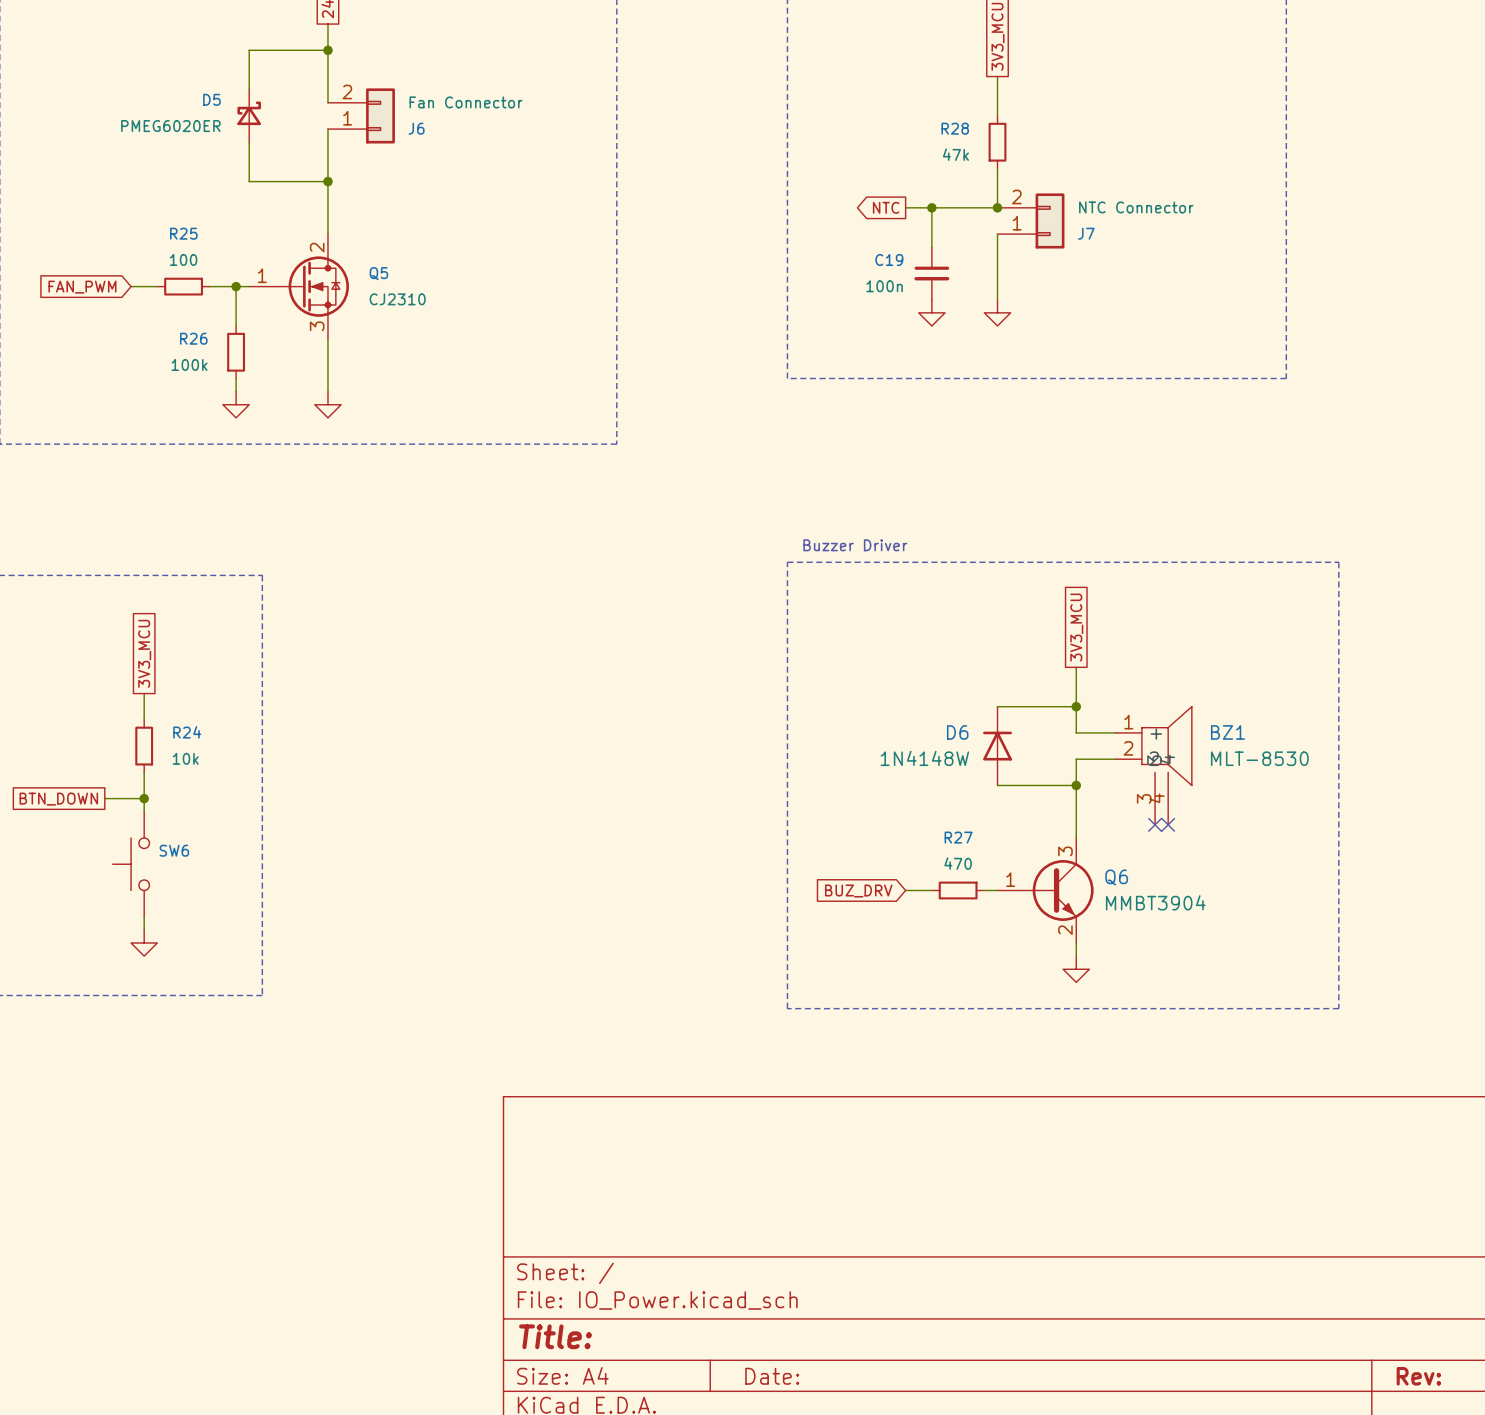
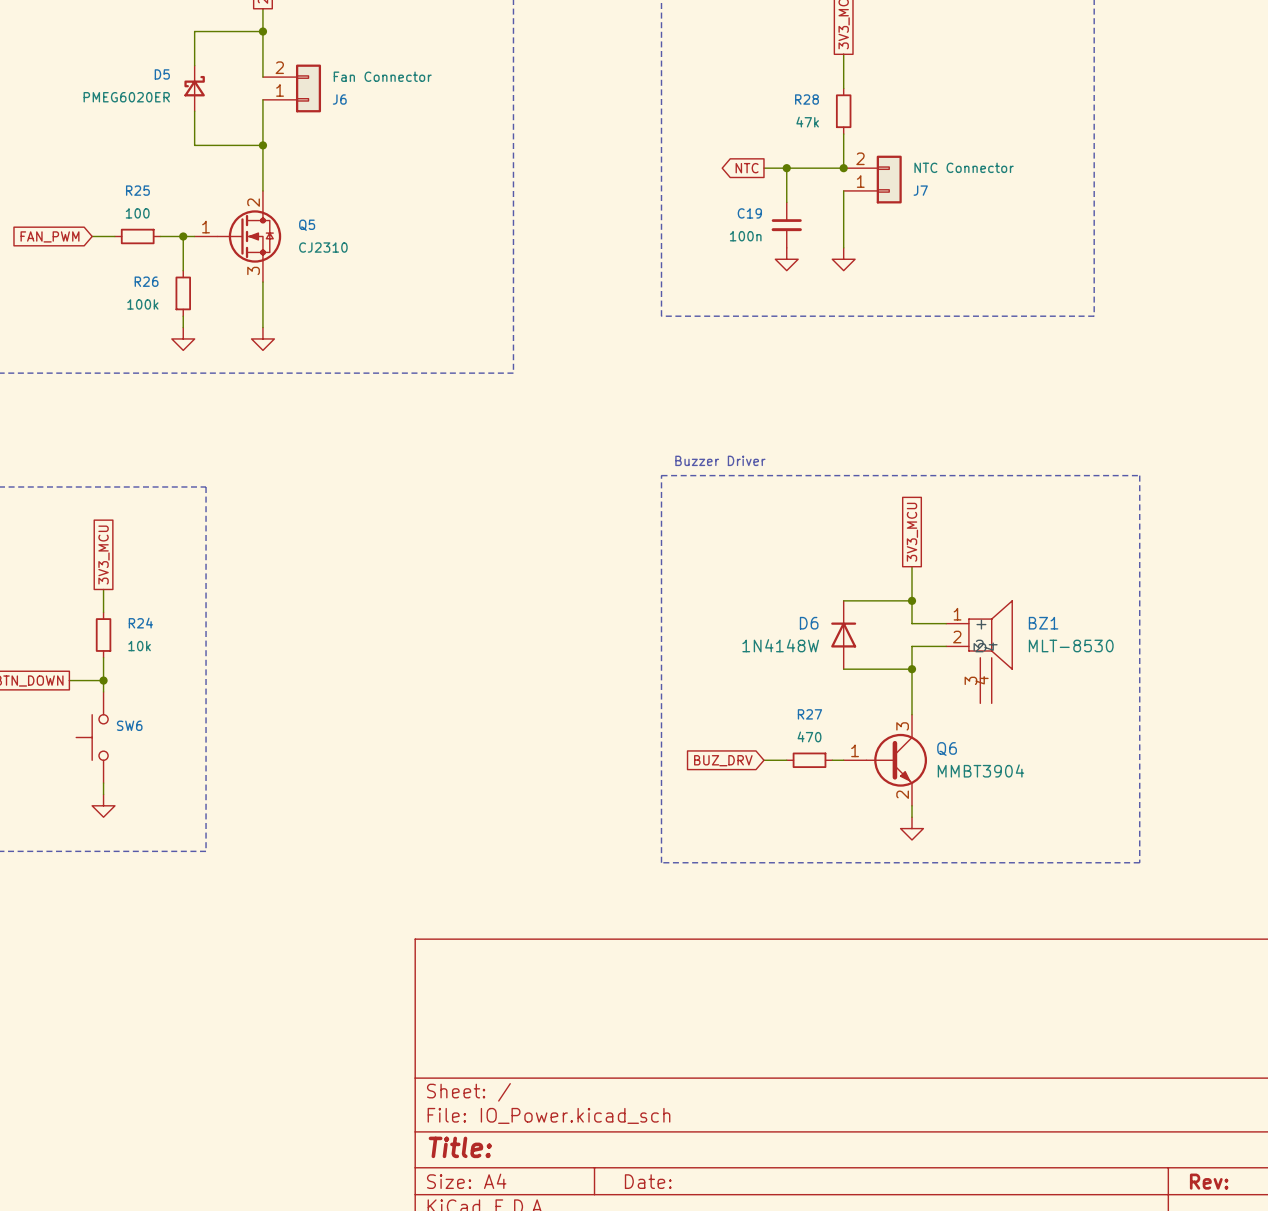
no-connect mark: (1155, 824) -> none
no-connect mark: (1168, 824) -> none

